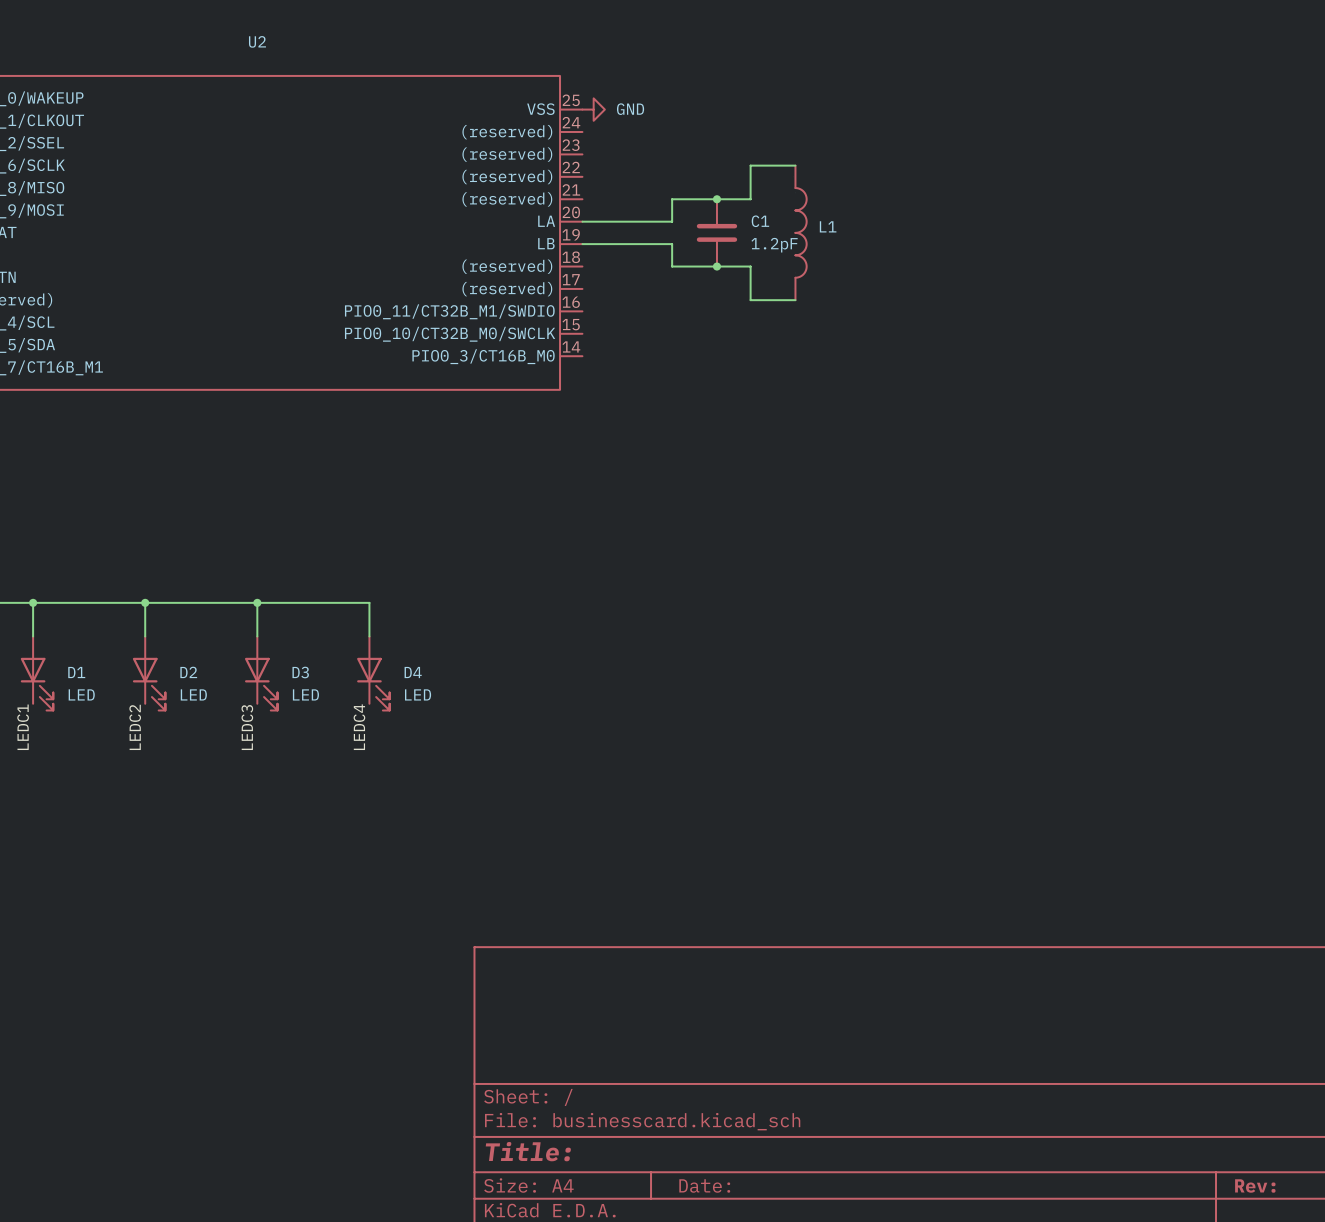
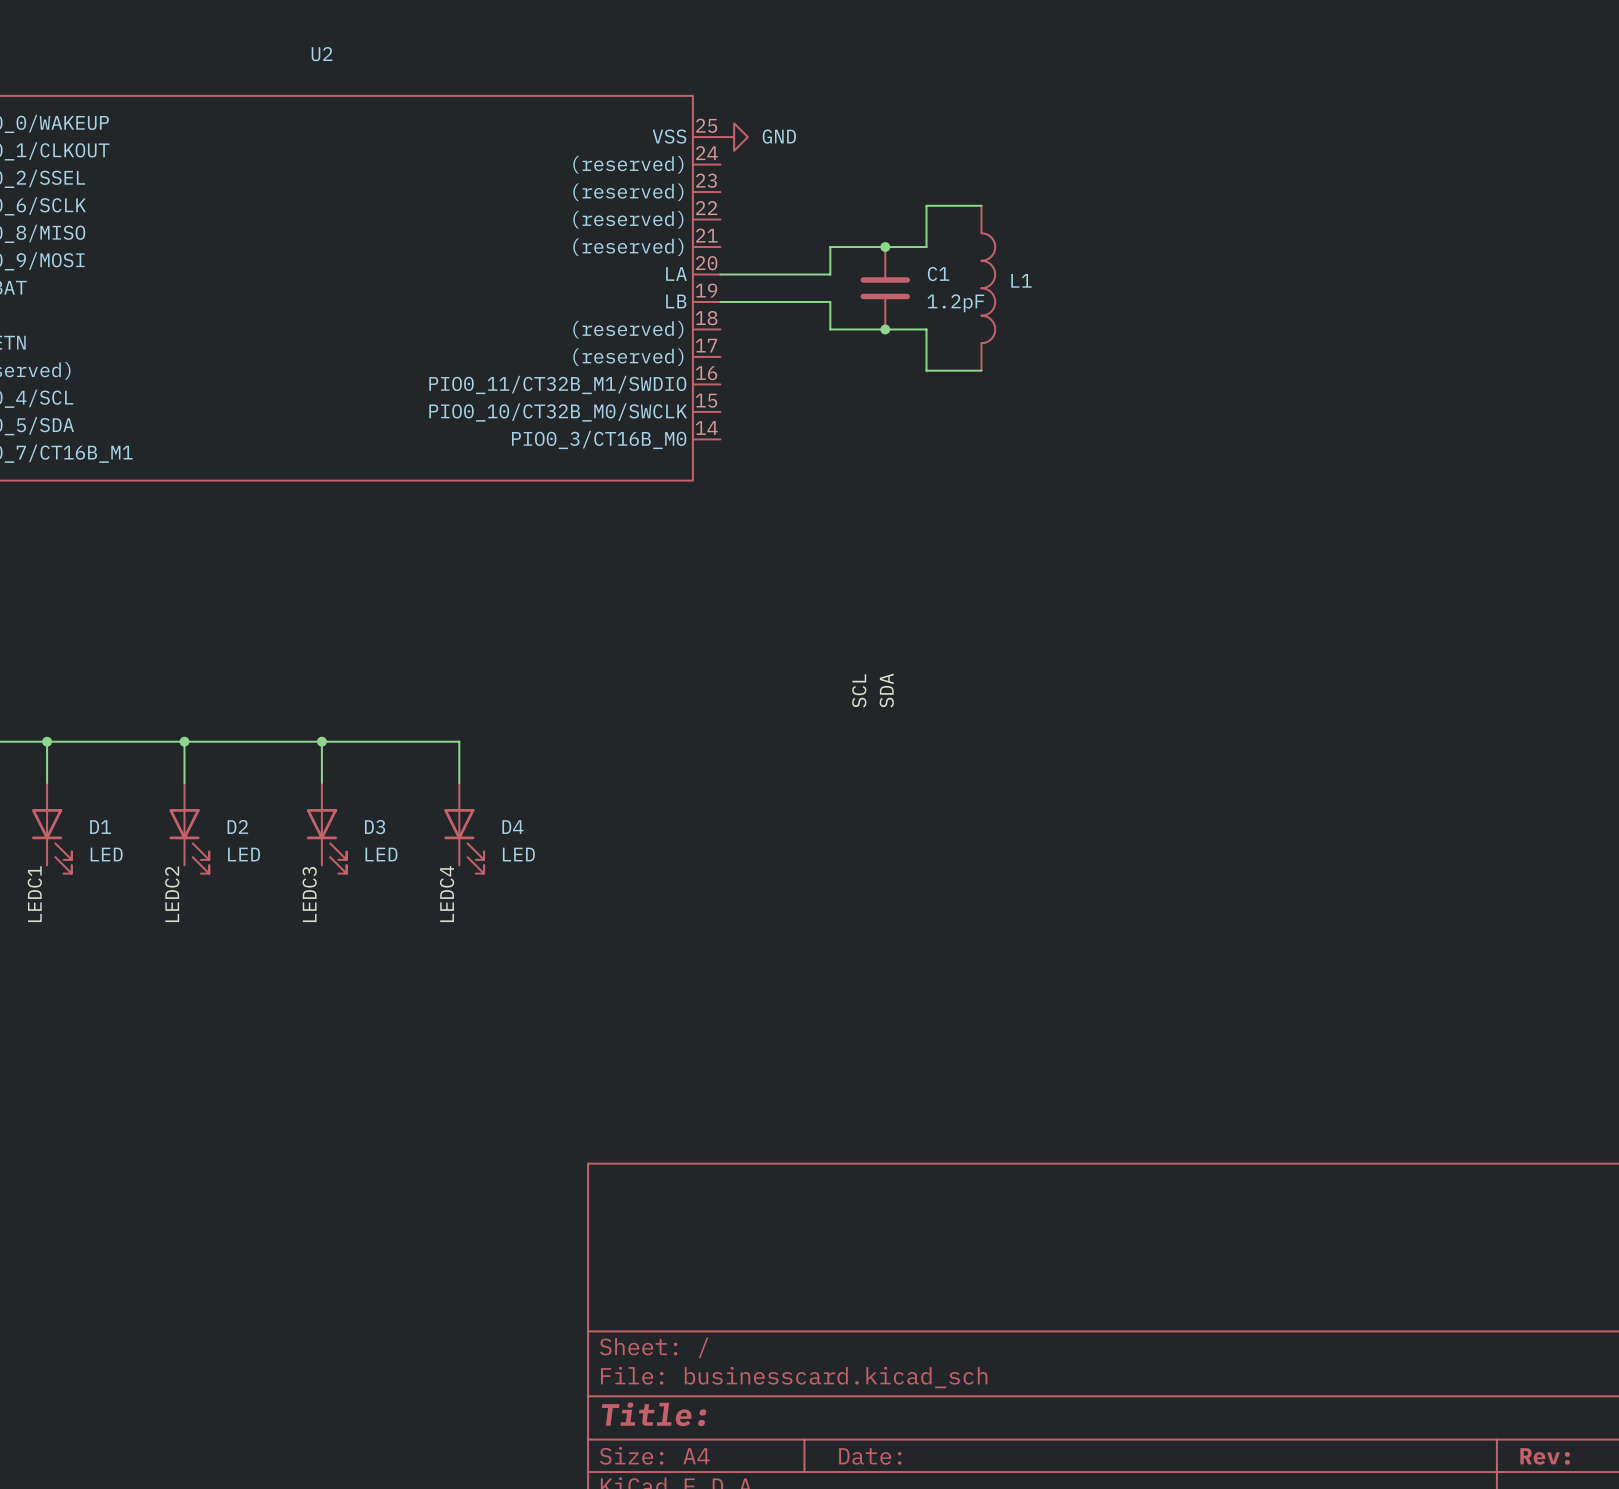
label: none -> SCL (859, 690)
label: none -> SDA (886, 690)

